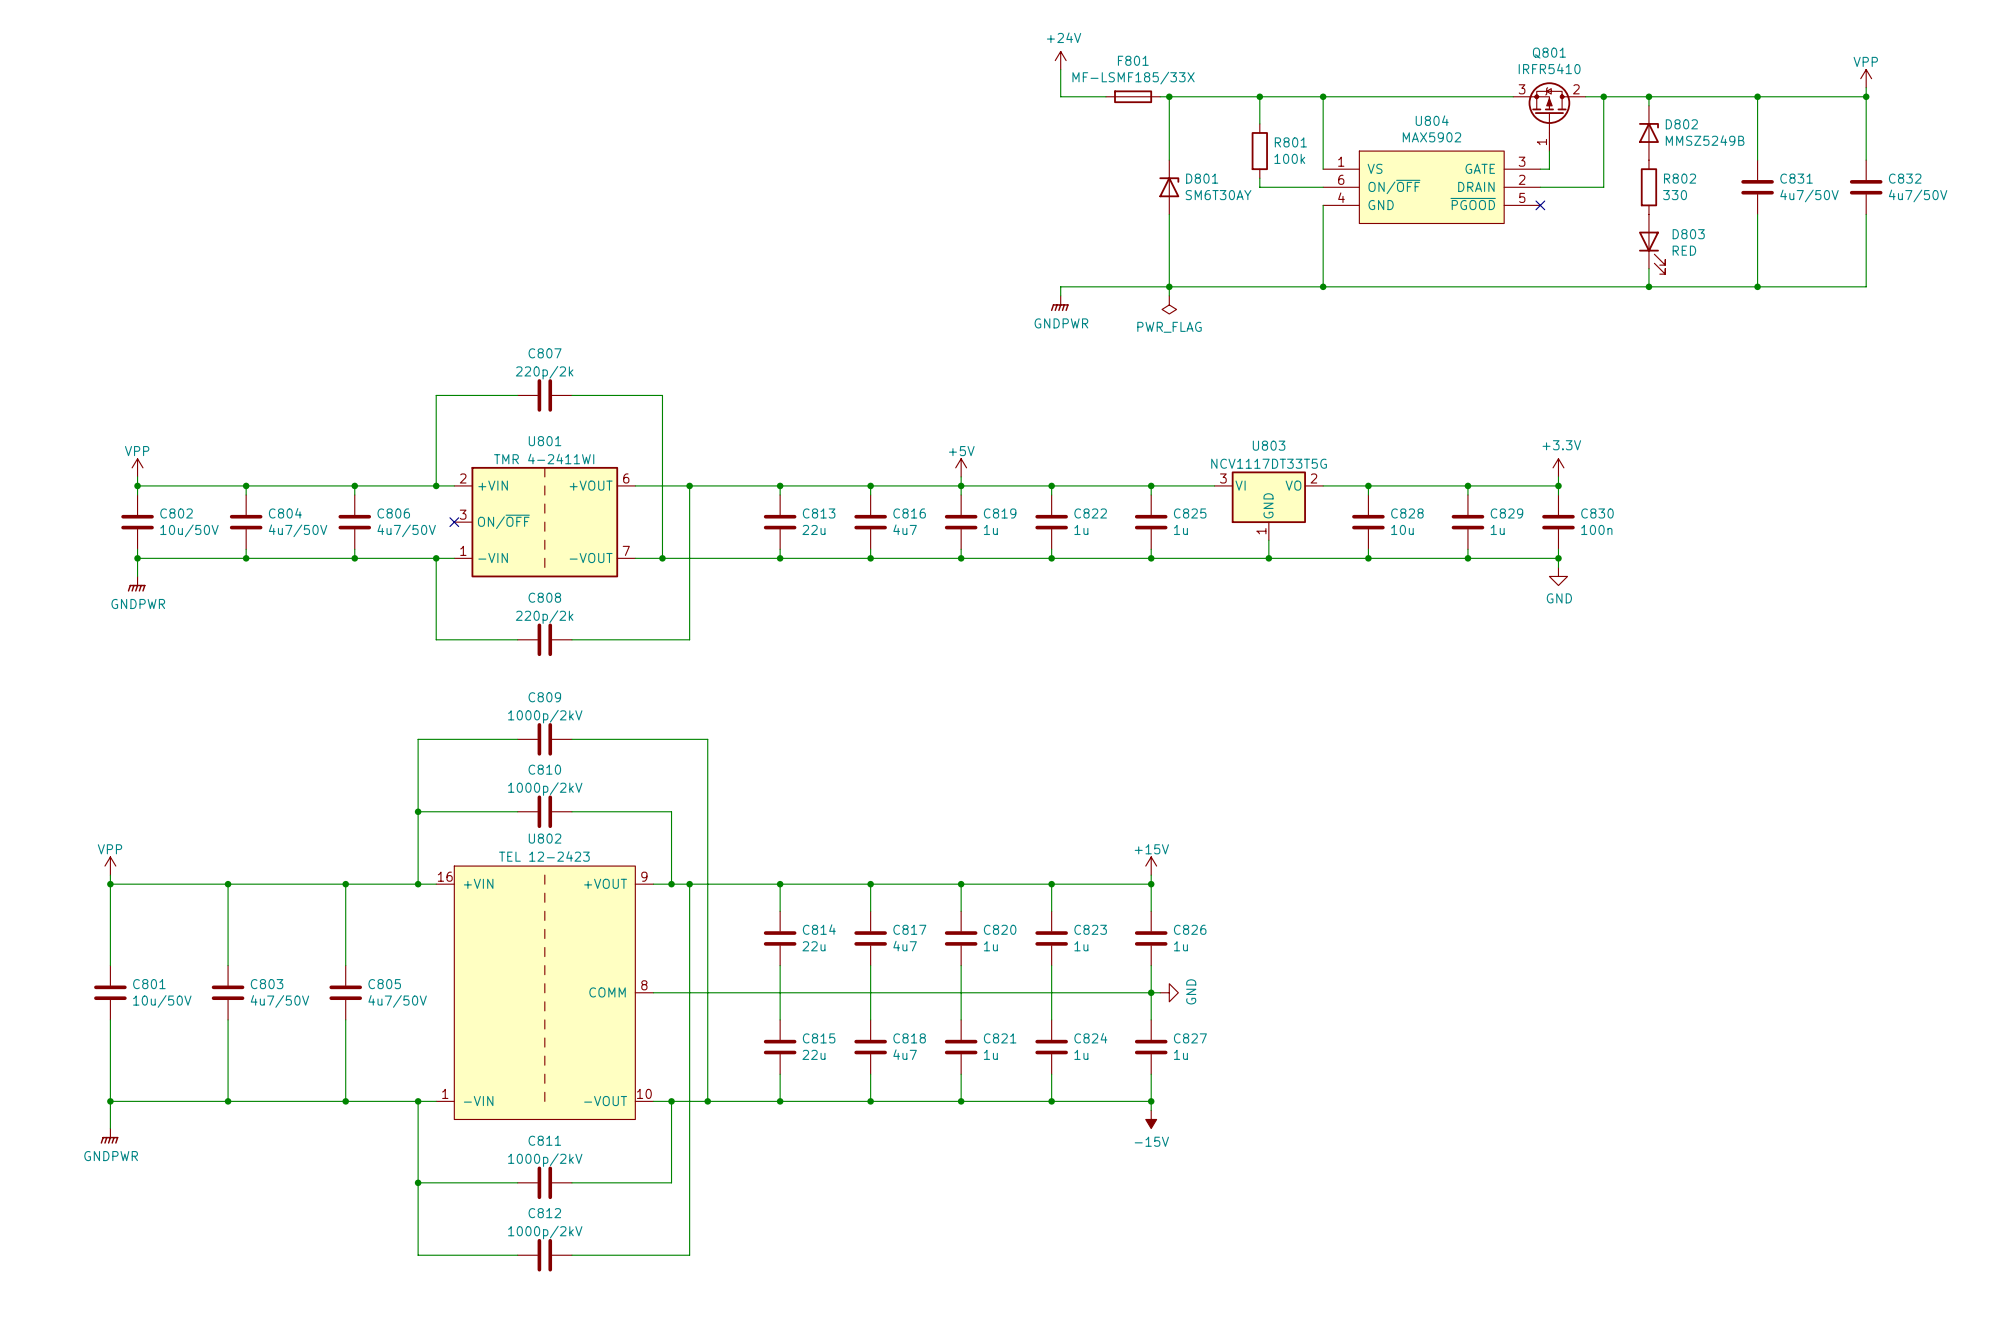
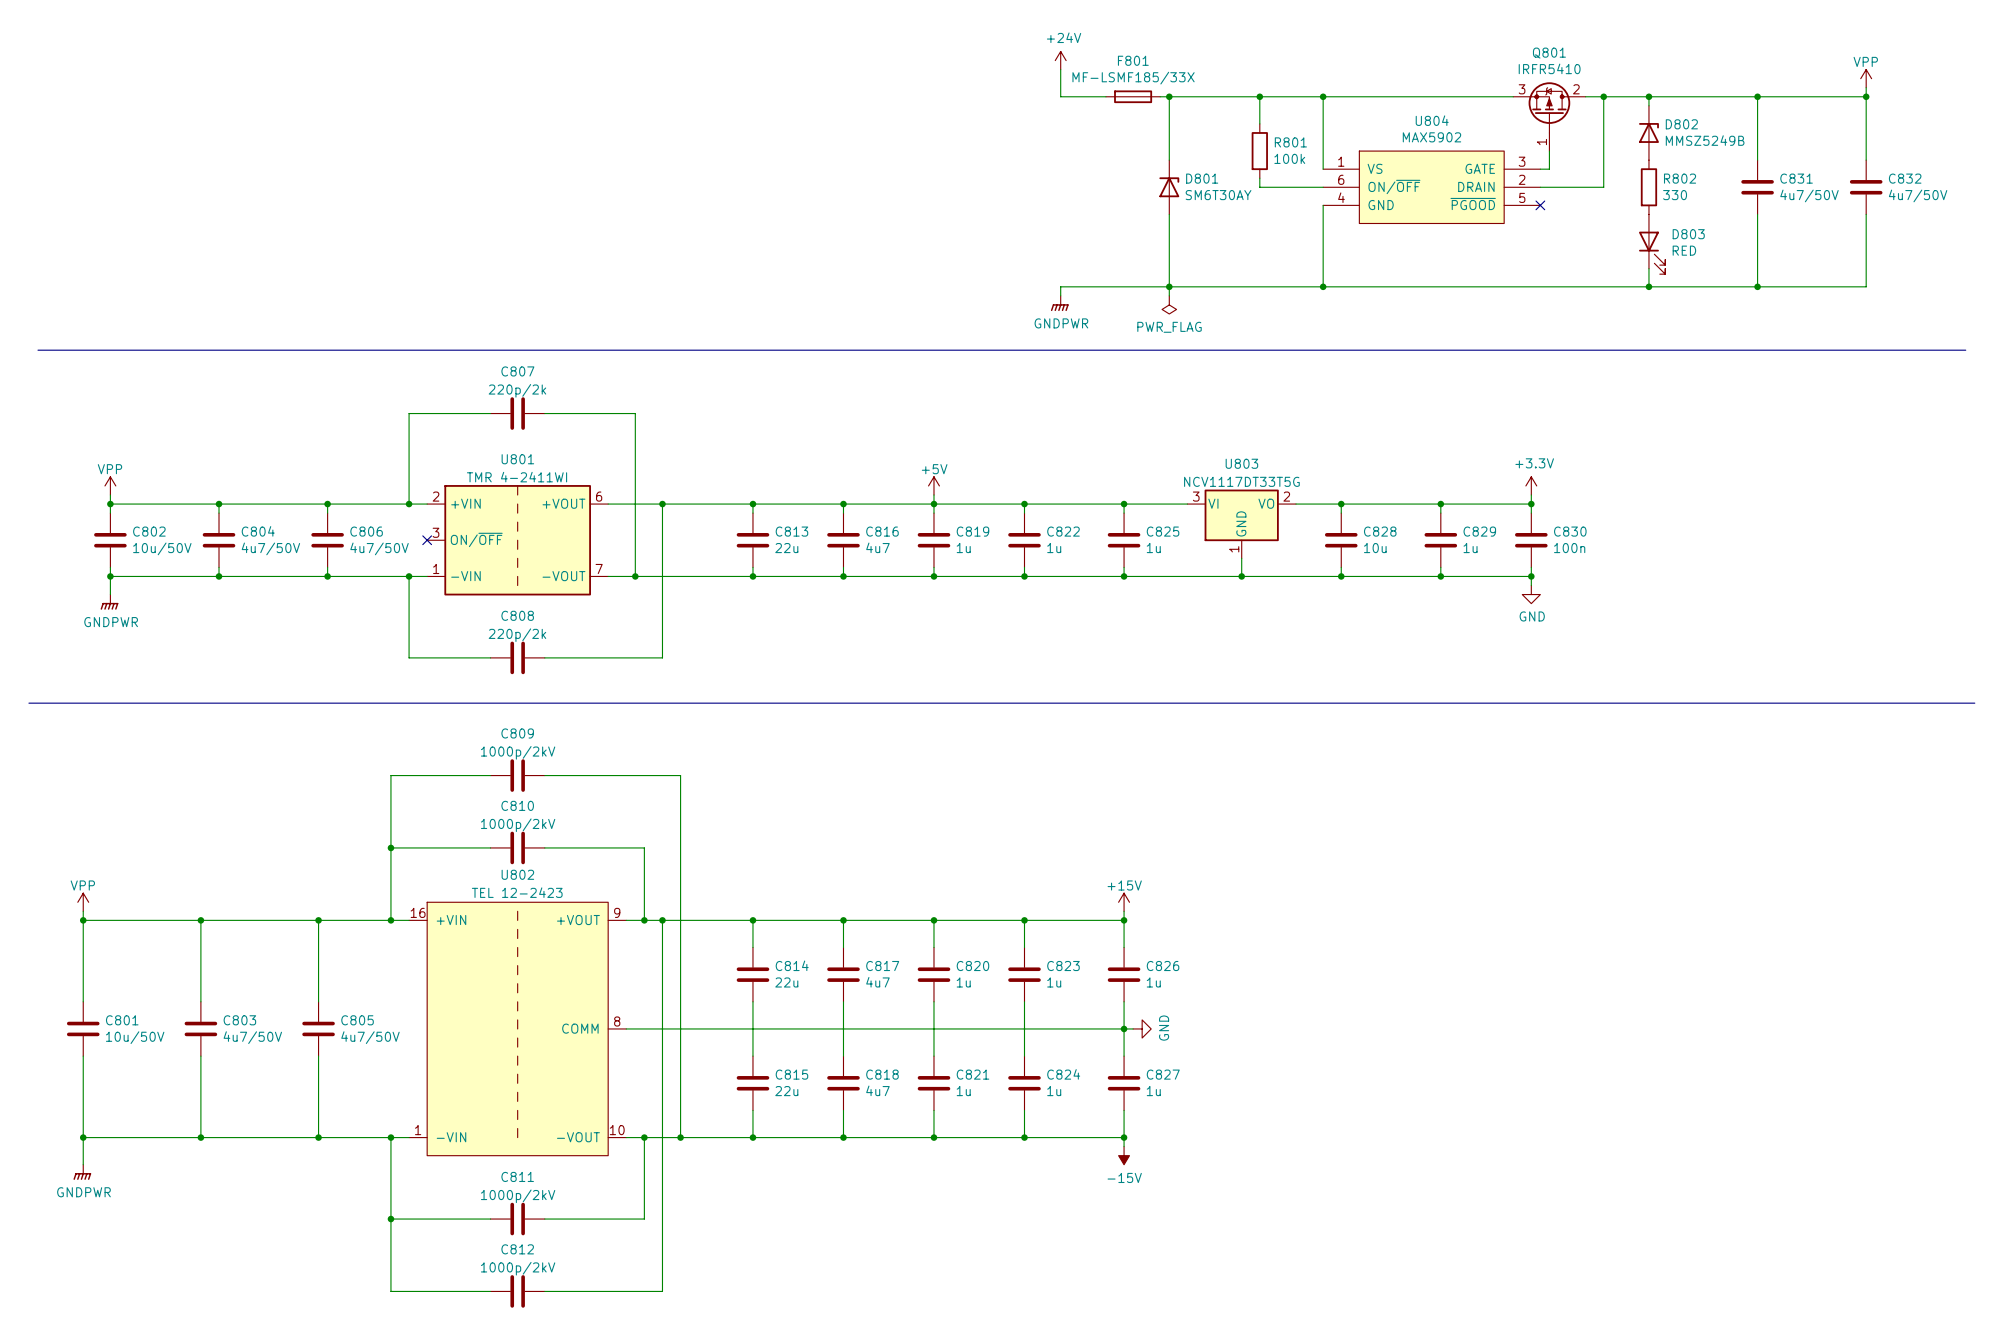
line: none -> (37, 350) (1965, 350)
wire: (517, 395) (436, 395) (436, 485) -> (490, 413) (409, 413) (409, 504)
C807 position: (544, 395) -> (517, 413)
wire: (571, 395) (662, 395) (662, 504) -> none
wire: none -> (544, 413) (635, 413) (635, 576)
power symbol position: VPP (137, 467) -> VPP (110, 485)
power symbol position: +5V (961, 467) -> +5V (933, 485)
power symbol position: +3.3V (1558, 467) -> +3.3V (1531, 485)
wire: (137, 476) (137, 494) -> (110, 494) (110, 513)
wire: (961, 476) (961, 494) -> (933, 494) (933, 513)
wire: (1558, 476) (1558, 494) -> (1531, 494) (1531, 513)
wire: (137, 485) (454, 485) -> (110, 504) (427, 504)
junction: (137, 485) -> none
wire: (246, 485) (246, 494) -> (219, 504) (219, 513)
junction: (246, 485) -> none
wire: (354, 485) (354, 494) -> (327, 504) (327, 513)
junction: (354, 485) -> none
junction: (436, 485) -> none
wire: (635, 485) (1214, 485) -> (608, 504) (1187, 504)
wire: (689, 485) (689, 639) (571, 639) -> none
junction: (689, 485) -> none
wire: (780, 485) (780, 494) -> (752, 504) (752, 513)
junction: (780, 485) -> none
wire: (870, 485) (870, 494) -> (843, 504) (843, 513)
junction: (870, 485) -> none
junction: (961, 485) -> none
wire: (1051, 485) (1051, 494) -> (1024, 504) (1024, 513)
junction: (1051, 485) -> none
wire: (1151, 485) (1151, 494) -> (1124, 504) (1124, 513)
junction: (1151, 485) -> none
wire: (1323, 485) (1558, 485) -> (1296, 504) (1531, 504)
wire: (1368, 485) (1368, 494) -> (1341, 504) (1341, 513)
junction: (1368, 485) -> none
wire: (1467, 485) (1467, 494) -> (1440, 504) (1440, 513)
junction: (1467, 485) -> none
junction: (1558, 485) -> none
junction: none -> (110, 504)
junction: none -> (219, 504)
junction: none -> (327, 504)
junction: none -> (409, 504)
junction: none -> (662, 504)
junction: none -> (752, 504)
junction: none -> (843, 504)
junction: none -> (933, 504)
junction: none -> (1024, 504)
junction: none -> (1124, 504)
junction: none -> (1341, 504)
junction: none -> (1440, 504)
junction: none -> (1531, 504)
U803 position: (1268, 505) -> (1241, 523)
C802 position: (137, 522) -> (110, 540)
C804 position: (246, 522) -> (219, 540)
C806 position: (354, 522) -> (327, 540)
no-connect mark position: (454, 522) -> (427, 540)
U801 position: (544, 522) -> (517, 540)
C813 position: (780, 522) -> (752, 540)
C816 position: (870, 522) -> (843, 540)
C819 position: (961, 522) -> (933, 540)
C822 position: (1051, 522) -> (1024, 540)
C825 position: (1151, 522) -> (1124, 540)
C828 position: (1368, 522) -> (1341, 540)
C829 position: (1467, 522) -> (1440, 540)
C830 position: (1558, 522) -> (1531, 540)
wire: (1268, 540) (1268, 558) -> (1241, 558) (1241, 576)
wire: (137, 549) (137, 576) -> (110, 567) (110, 594)
wire: (246, 549) (246, 558) -> (219, 567) (219, 576)
wire: (354, 549) (354, 558) -> (327, 567) (327, 576)
wire: (780, 549) (780, 558) -> (752, 567) (752, 576)
wire: (870, 549) (870, 558) -> (843, 567) (843, 576)
wire: (961, 549) (961, 558) -> (933, 567) (933, 576)
wire: (1051, 549) (1051, 558) -> (1024, 567) (1024, 576)
wire: (1151, 549) (1151, 558) -> (1124, 567) (1124, 576)
wire: (1368, 549) (1368, 558) -> (1341, 567) (1341, 576)
wire: (1467, 549) (1467, 558) -> (1440, 567) (1440, 576)
wire: (1558, 549) (1558, 567) -> (1531, 567) (1531, 585)
wire: (137, 558) (454, 558) -> (110, 576) (427, 576)
junction: (137, 558) -> none
junction: (246, 558) -> none
junction: (354, 558) -> none
wire: (436, 558) (436, 639) (517, 639) -> (409, 576) (409, 657) (490, 657)
junction: (436, 558) -> none
wire: (635, 558) (1558, 558) -> (608, 576) (1531, 576)
wire: none -> (662, 558) (662, 657) (544, 657)
junction: (662, 558) -> none
junction: (780, 558) -> none
junction: (870, 558) -> none
junction: (961, 558) -> none
junction: (1051, 558) -> none
junction: (1151, 558) -> none
junction position: (1268, 558) -> (1241, 576)
junction: (1368, 558) -> none
junction: (1467, 558) -> none
junction: (1558, 558) -> none
junction: none -> (110, 576)
junction: none -> (219, 576)
junction: none -> (327, 576)
junction: none -> (409, 576)
junction: none -> (635, 576)
junction: none -> (752, 576)
junction: none -> (843, 576)
junction: none -> (933, 576)
junction: none -> (1024, 576)
junction: none -> (1124, 576)
junction: none -> (1341, 576)
junction: none -> (1440, 576)
junction: none -> (1531, 576)
power symbol position: GND (1558, 576) -> GND (1531, 594)
power symbol position: GNDPWR (136, 584) -> GNDPWR (109, 602)
C808 position: (544, 639) -> (517, 657)
line: none -> (28, 703) (1974, 703)
wire: (517, 739) (418, 739) (418, 884) -> (490, 775) (390, 775) (390, 920)
C809 position: (544, 739) -> (517, 775)
wire: (571, 739) (707, 739) (707, 1101) -> (544, 775) (680, 775) (680, 1137)
wire: (418, 811) (517, 811) -> (390, 847) (490, 847)
junction: (418, 811) -> none
C810 position: (544, 811) -> (517, 847)
wire: (571, 811) (671, 811) (671, 884) -> (544, 847) (644, 847) (644, 920)
junction: none -> (390, 847)
power symbol position: VPP (110, 866) -> VPP (83, 902)
power symbol position: +15V (1151, 866) -> +15V (1124, 902)
wire: (110, 875) (110, 965) -> (83, 911) (83, 1001)
wire: (1151, 875) (1151, 911) -> (1124, 911) (1124, 947)
wire: (110, 884) (436, 884) -> (83, 920) (409, 920)
junction: (110, 884) -> none
wire: (228, 884) (228, 965) -> (200, 920) (200, 1001)
junction: (228, 884) -> none
wire: (345, 884) (345, 965) -> (318, 920) (318, 1001)
junction: (345, 884) -> none
junction: (418, 884) -> none
wire: (653, 884) (1151, 884) -> (626, 920) (1124, 920)
junction: (671, 884) -> none
wire: (689, 884) (689, 1255) (571, 1255) -> (662, 920) (662, 1291) (544, 1291)
junction: (689, 884) -> none
wire: (780, 884) (780, 911) -> (752, 920) (752, 947)
junction: (780, 884) -> none
wire: (870, 884) (870, 911) -> (843, 920) (843, 947)
junction: (870, 884) -> none
wire: (961, 884) (961, 911) -> (933, 920) (933, 947)
junction: (961, 884) -> none
wire: (1051, 884) (1051, 911) -> (1024, 920) (1024, 947)
junction: (1051, 884) -> none
junction: (1151, 884) -> none
junction: none -> (83, 920)
junction: none -> (200, 920)
junction: none -> (318, 920)
junction: none -> (390, 920)
junction: none -> (644, 920)
junction: none -> (662, 920)
junction: none -> (752, 920)
junction: none -> (843, 920)
junction: none -> (933, 920)
junction: none -> (1024, 920)
junction: none -> (1124, 920)
C814 position: (780, 938) -> (752, 974)
C817 position: (870, 938) -> (843, 974)
C820 position: (961, 938) -> (933, 974)
C823 position: (1051, 938) -> (1024, 974)
C826 position: (1151, 938) -> (1124, 974)
wire: (780, 965) (780, 1019) -> (752, 1001) (752, 1056)
wire: (870, 965) (870, 1019) -> (843, 1001) (843, 1056)
wire: (961, 965) (961, 1019) -> (933, 1001) (933, 1056)
wire: (1051, 965) (1051, 1019) -> (1024, 1001) (1024, 1056)
wire: (1151, 965) (1151, 1019) -> (1124, 1001) (1124, 1056)
C801 position: (110, 992) -> (83, 1028)
C803 position: (228, 992) -> (200, 1028)
C805 position: (345, 992) -> (318, 1028)
U802 position: (544, 992) -> (517, 1028)
wire: (653, 992) (1160, 992) -> (626, 1028) (1133, 1028)
junction: (1151, 992) -> none
power symbol position: GND (1169, 992) -> GND (1142, 1028)
wire: (110, 1019) (110, 1128) -> (83, 1056) (83, 1164)
wire: (228, 1019) (228, 1101) -> (200, 1056) (200, 1137)
wire: (345, 1019) (345, 1101) -> (318, 1056) (318, 1137)
junction: none -> (1124, 1028)
C815 position: (780, 1047) -> (752, 1083)
C818 position: (870, 1047) -> (843, 1083)
C821 position: (961, 1047) -> (933, 1083)
C824 position: (1051, 1047) -> (1024, 1083)
C827 position: (1151, 1047) -> (1124, 1083)
wire: (780, 1074) (780, 1101) -> (752, 1110) (752, 1137)
wire: (870, 1074) (870, 1101) -> (843, 1110) (843, 1137)
wire: (961, 1074) (961, 1101) -> (933, 1110) (933, 1137)
wire: (1051, 1074) (1051, 1101) -> (1024, 1110) (1024, 1137)
wire: (1151, 1074) (1151, 1110) -> (1124, 1110) (1124, 1146)
wire: (110, 1101) (436, 1101) -> (83, 1137) (409, 1137)
junction: (110, 1101) -> none
junction: (228, 1101) -> none
junction: (345, 1101) -> none
wire: (418, 1101) (418, 1255) (517, 1255) -> (390, 1137) (390, 1291) (490, 1291)
junction: (418, 1101) -> none
wire: (653, 1101) (1151, 1101) -> (626, 1137) (1124, 1137)
wire: (671, 1101) (671, 1182) (571, 1182) -> (644, 1137) (644, 1219) (544, 1219)
junction: (671, 1101) -> none
junction: (707, 1101) -> none
junction: (780, 1101) -> none
junction: (870, 1101) -> none
junction: (961, 1101) -> none
junction: (1051, 1101) -> none
junction: (1151, 1101) -> none
power symbol position: -15V (1151, 1119) -> -15V (1124, 1155)
power symbol position: GNDPWR (109, 1136) -> GNDPWR (82, 1172)
junction: none -> (83, 1137)
junction: none -> (200, 1137)
junction: none -> (318, 1137)
junction: none -> (390, 1137)
junction: none -> (644, 1137)
junction: none -> (680, 1137)
junction: none -> (752, 1137)
junction: none -> (843, 1137)
junction: none -> (933, 1137)
junction: none -> (1024, 1137)
junction: none -> (1124, 1137)
wire: (418, 1182) (517, 1182) -> (390, 1219) (490, 1219)
junction: (418, 1182) -> none
C811 position: (544, 1182) -> (517, 1219)
junction: none -> (390, 1219)
C812 position: (544, 1255) -> (517, 1291)

